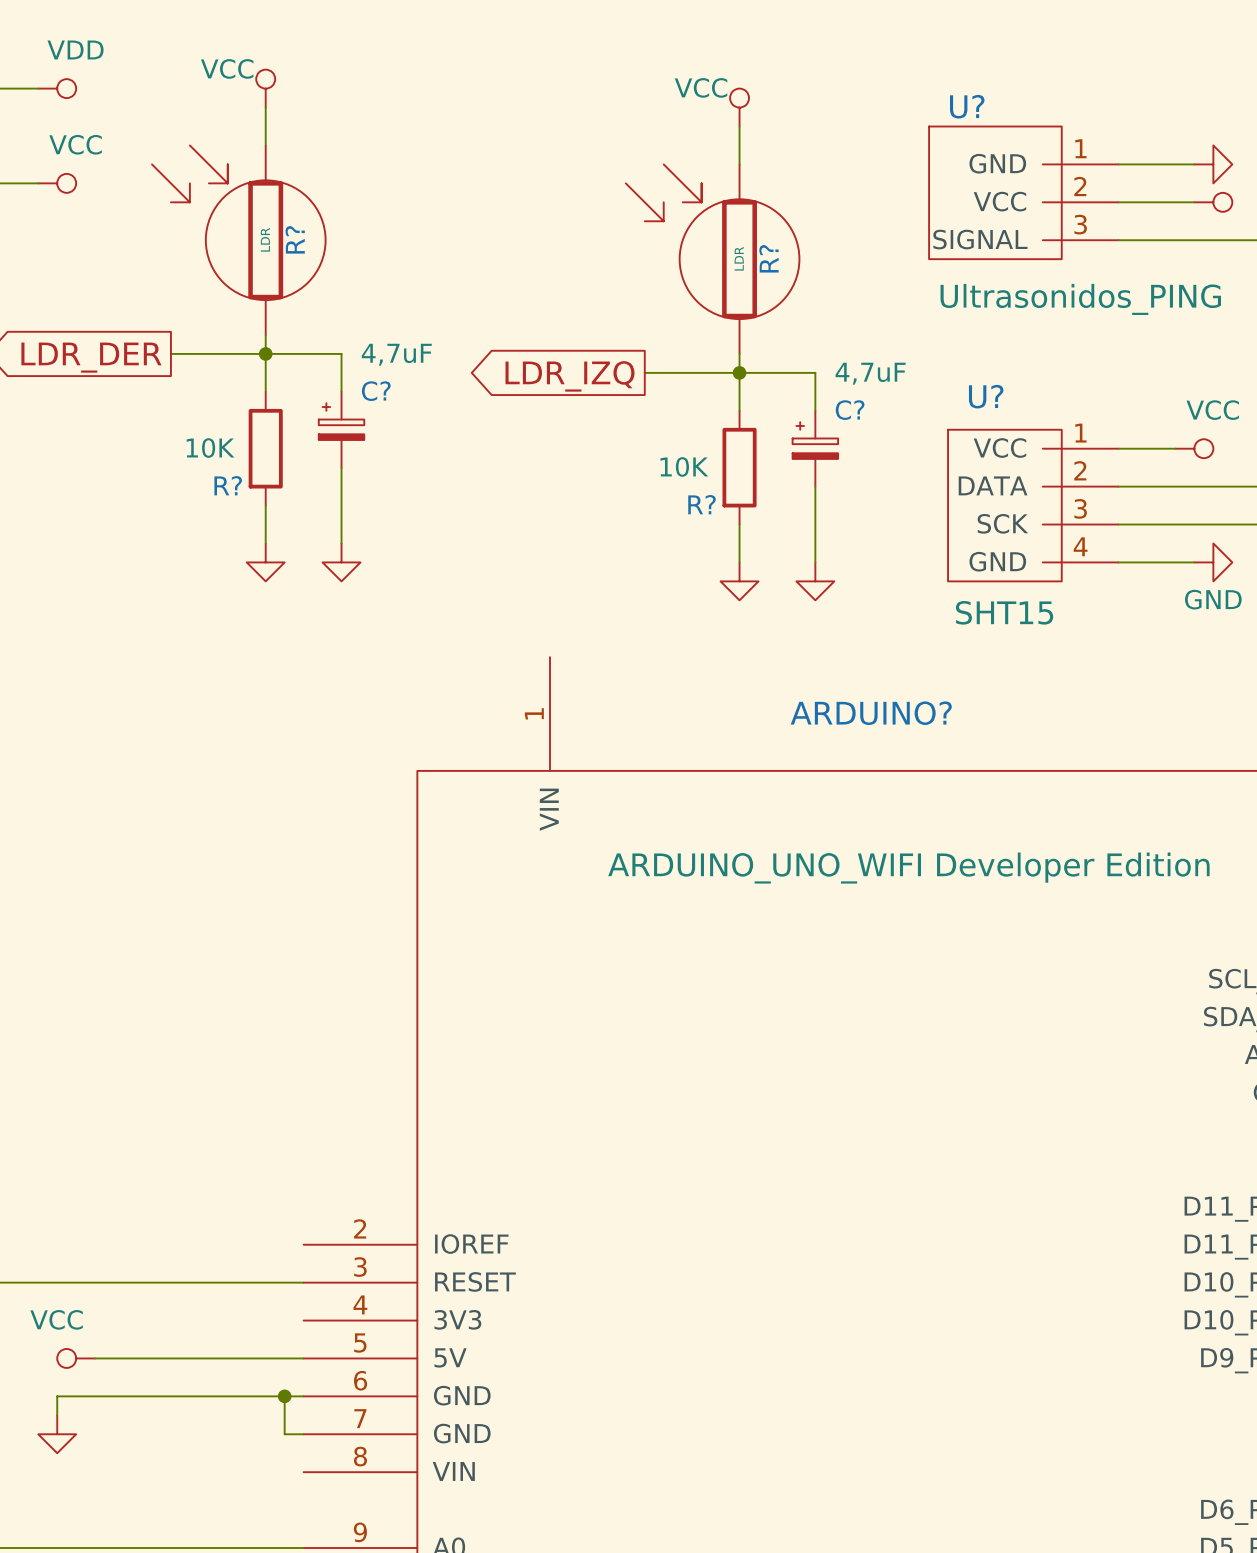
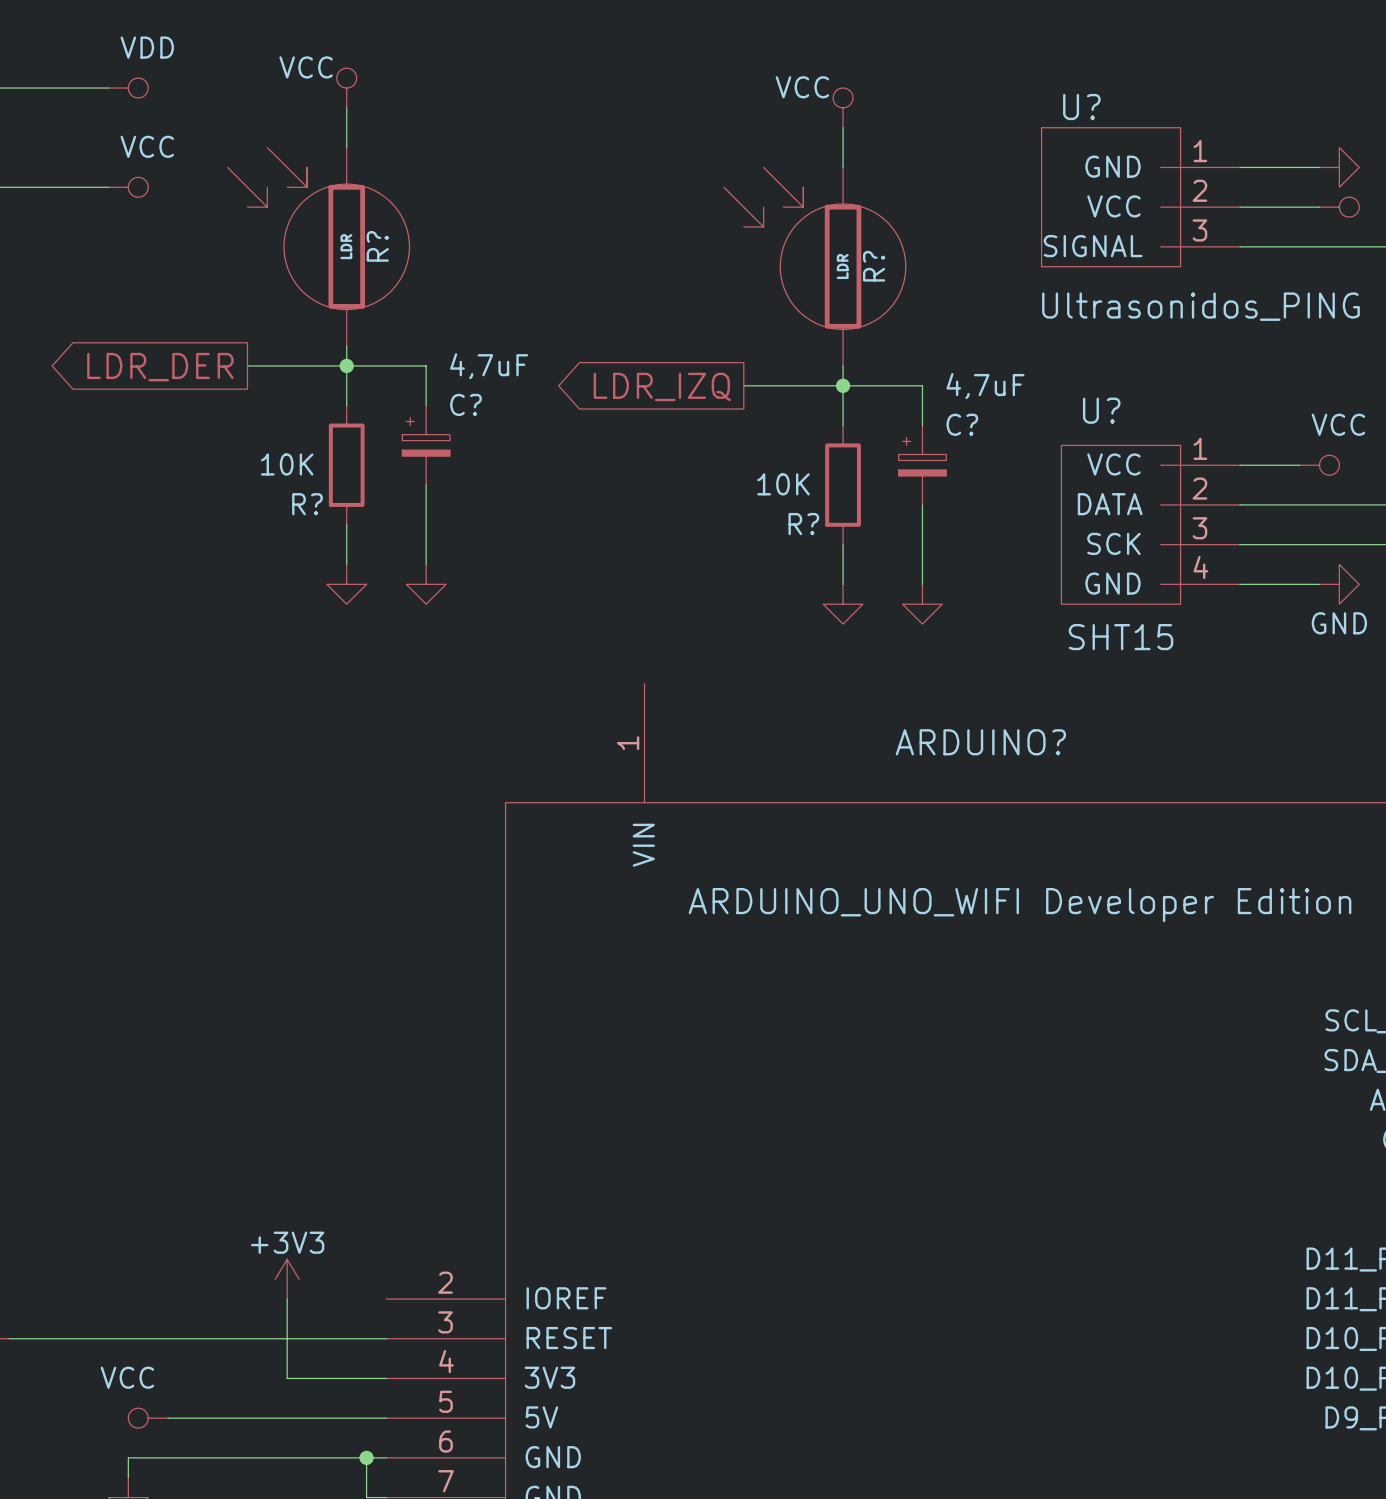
power symbol: none -> +3V3 (287, 1279)
wire: none -> (287, 1299) (287, 1378) (386, 1378)

